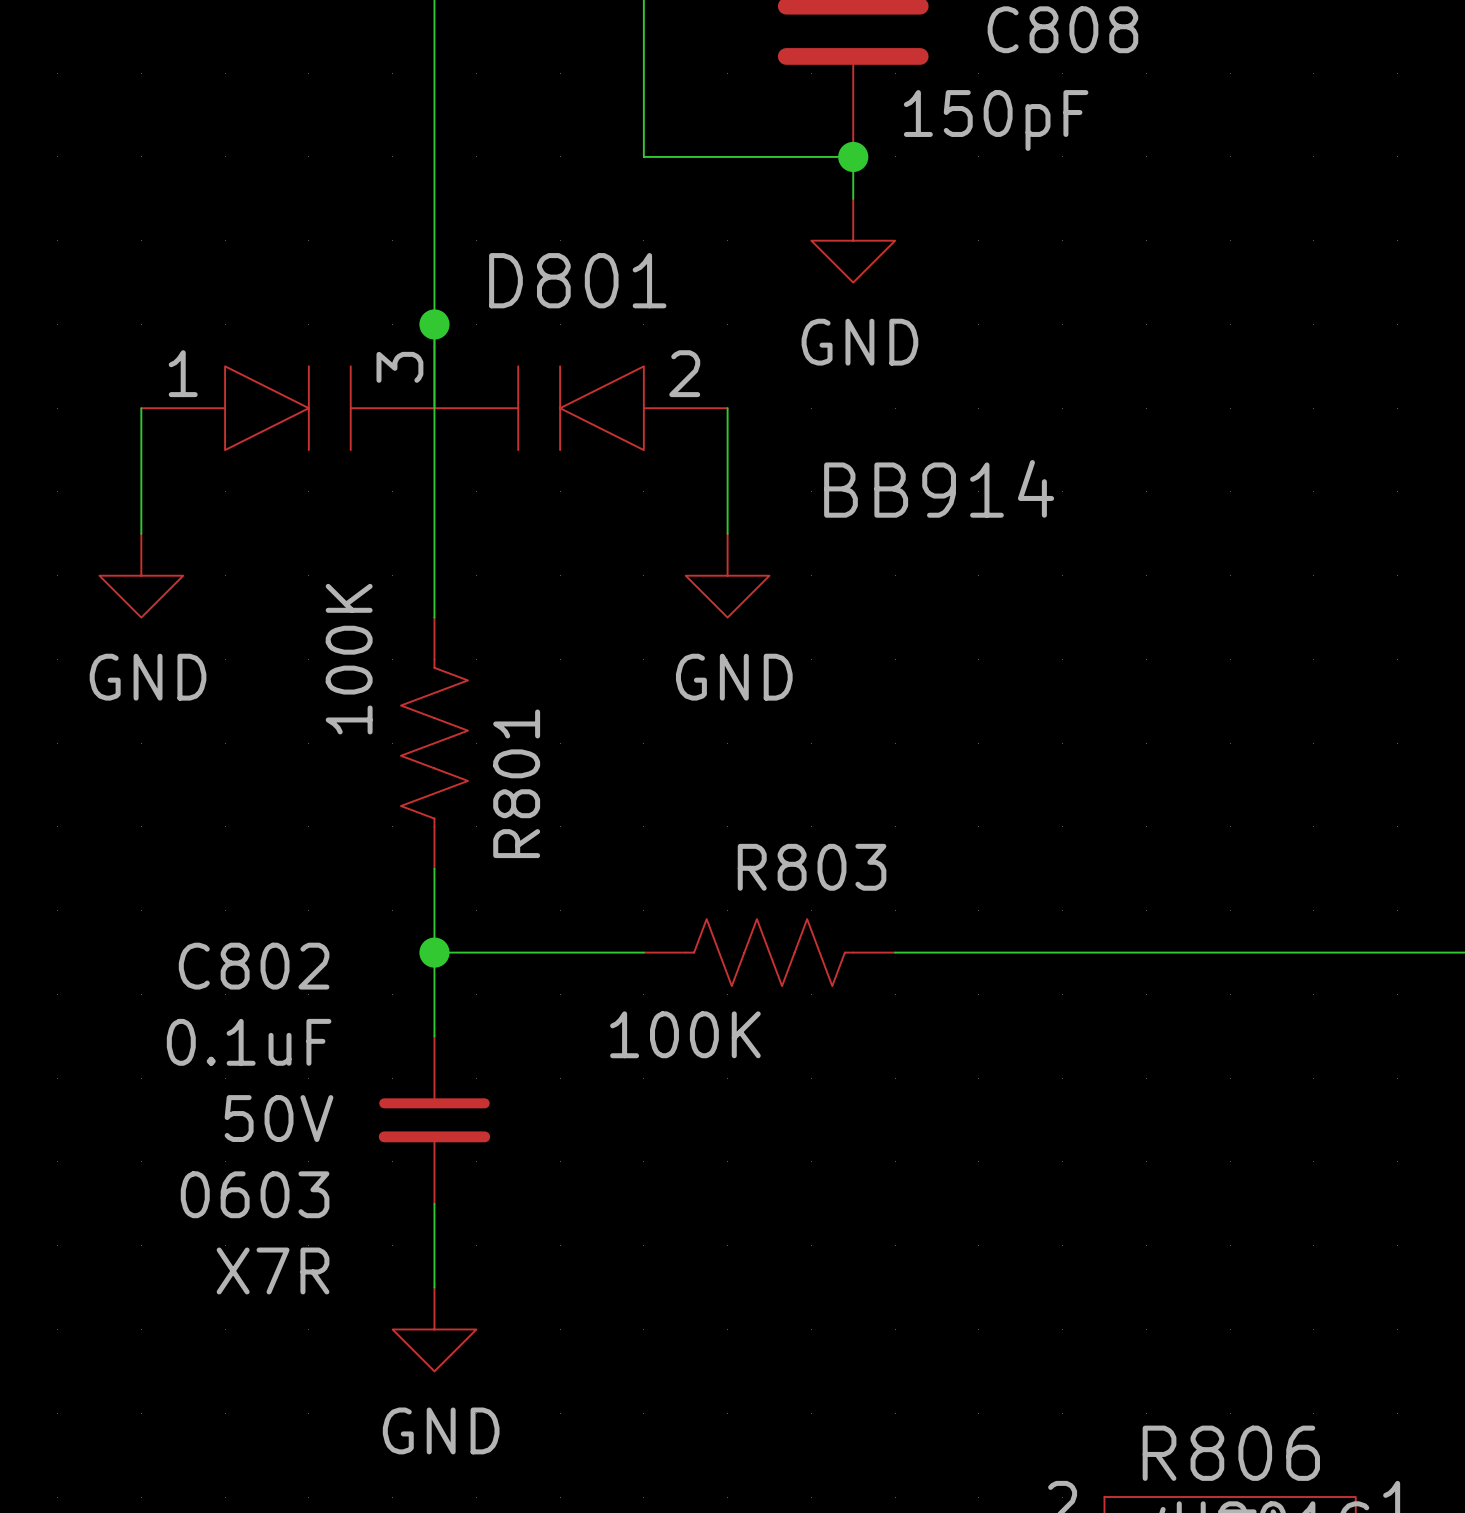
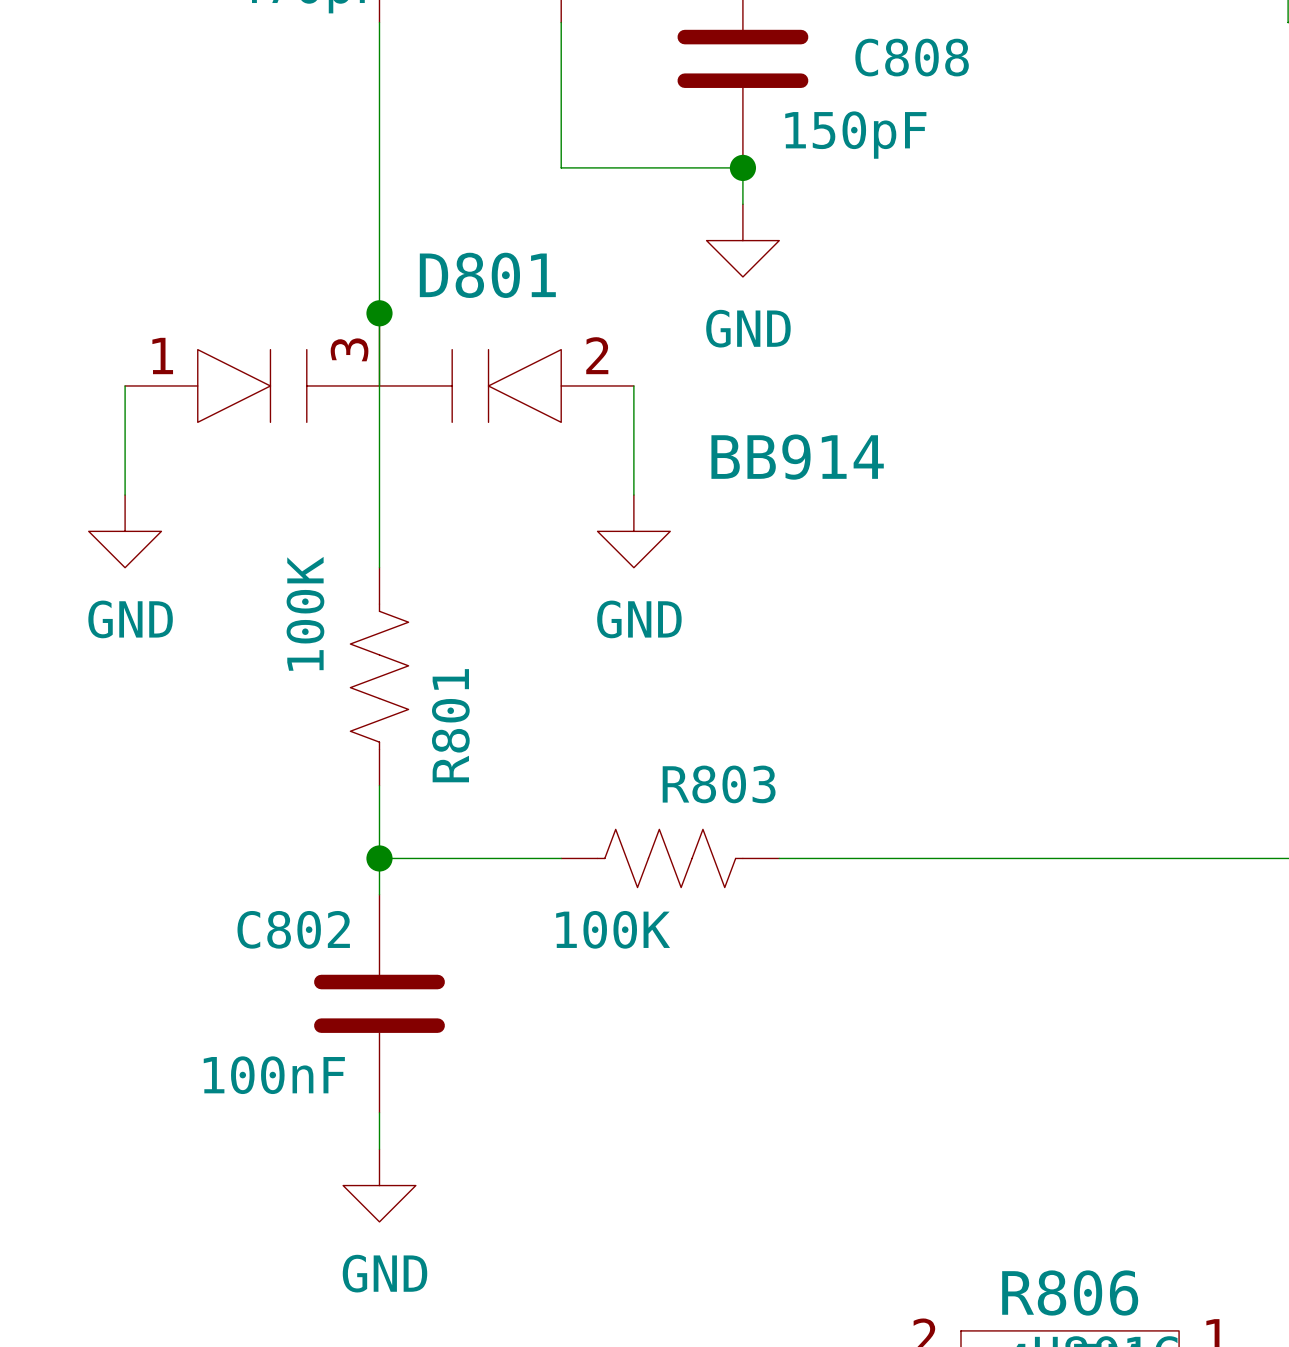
C802 name position: C802 (254, 966) -> C802 (293, 929)
C802 symbol: [378, 1036, 491, 1204] -> [314, 894, 445, 1113]
C802 value: 0.1uF (249, 1042) -> 100nF (274, 1075)
C802 text: 50V (279, 1118) -> none
C802 text: 0603 (255, 1194) -> none
C802 text: X7R (273, 1270) -> none

